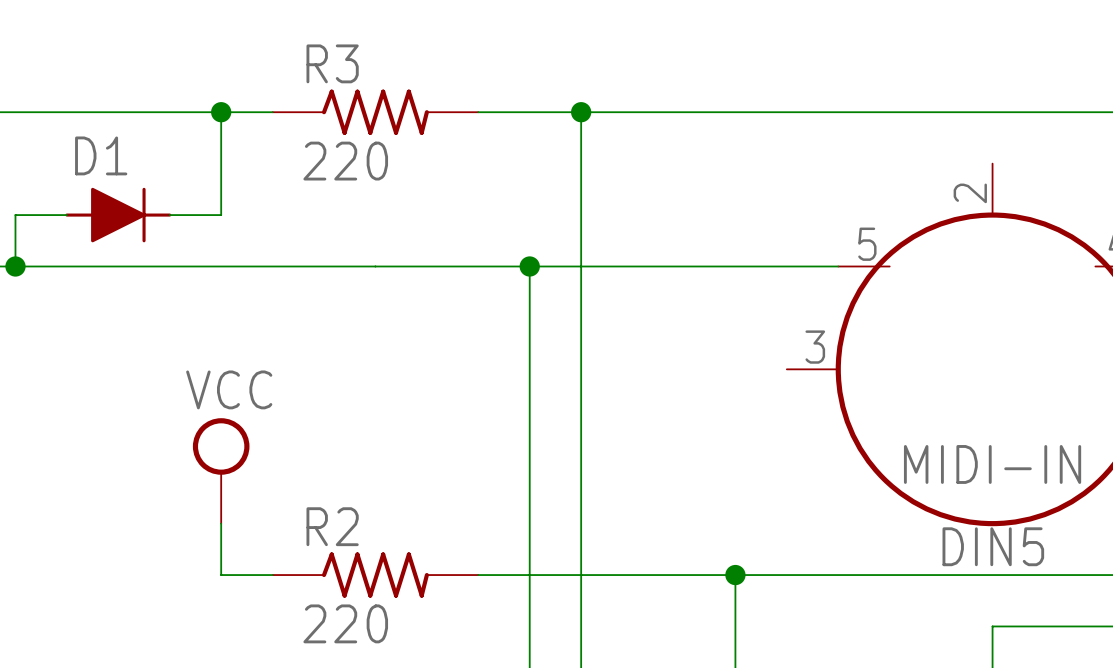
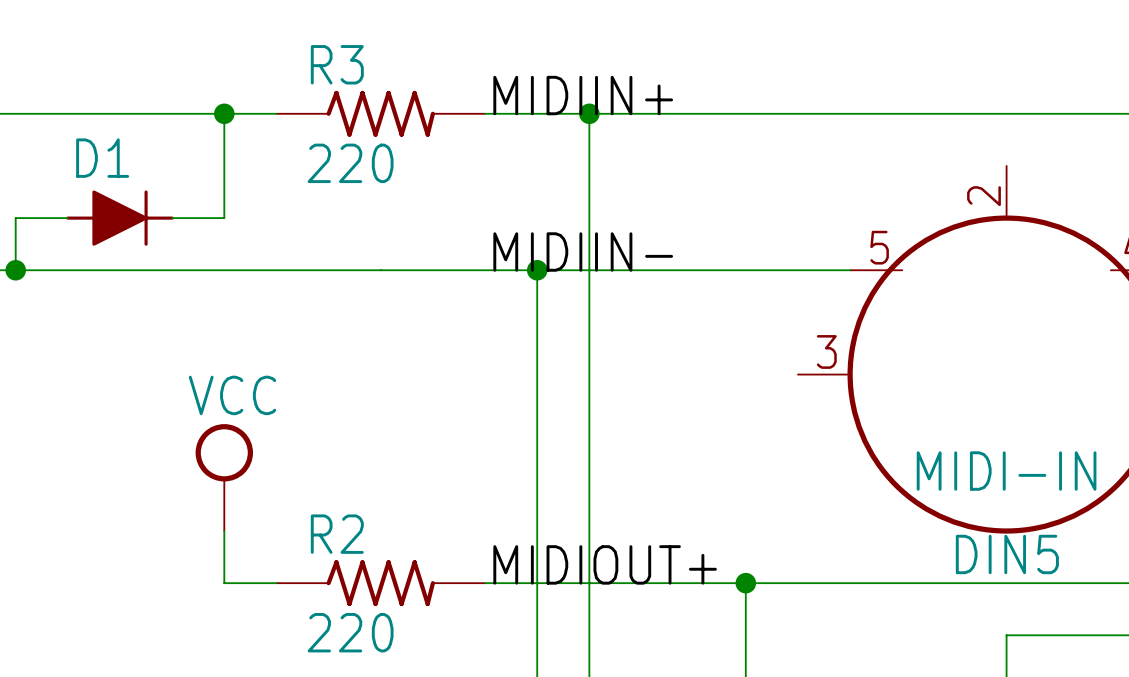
label: none -> MIDIIN+ (583, 95)
label: none -> MIDIIN- (583, 252)
label: none -> MIDIOUT+ (605, 564)

